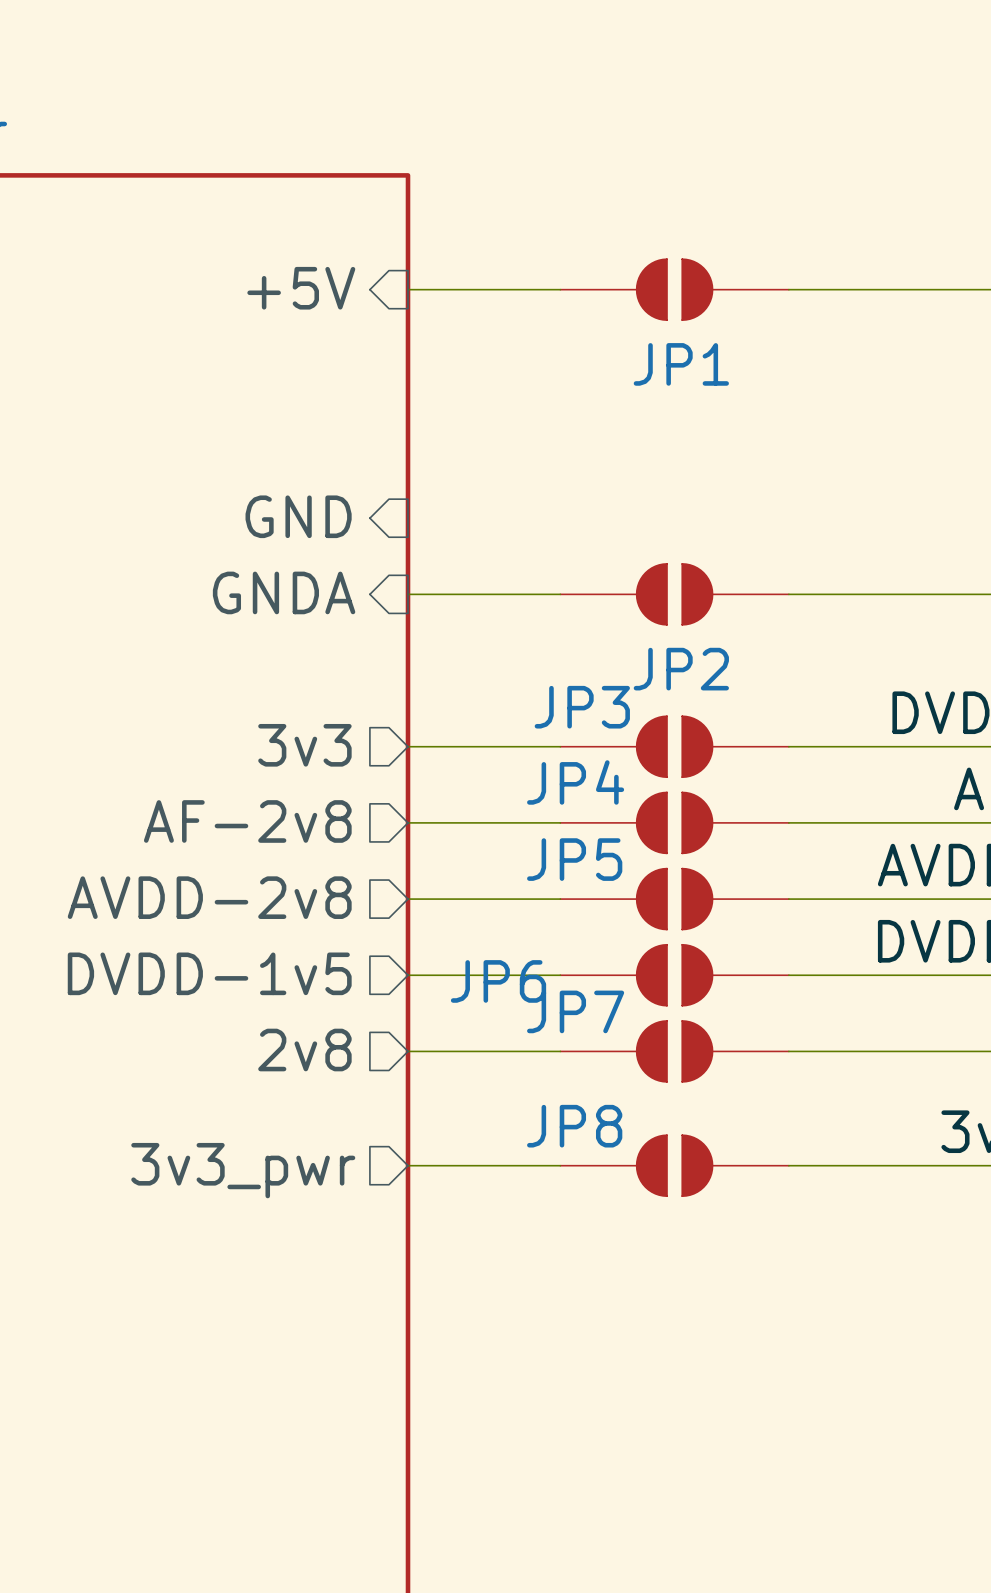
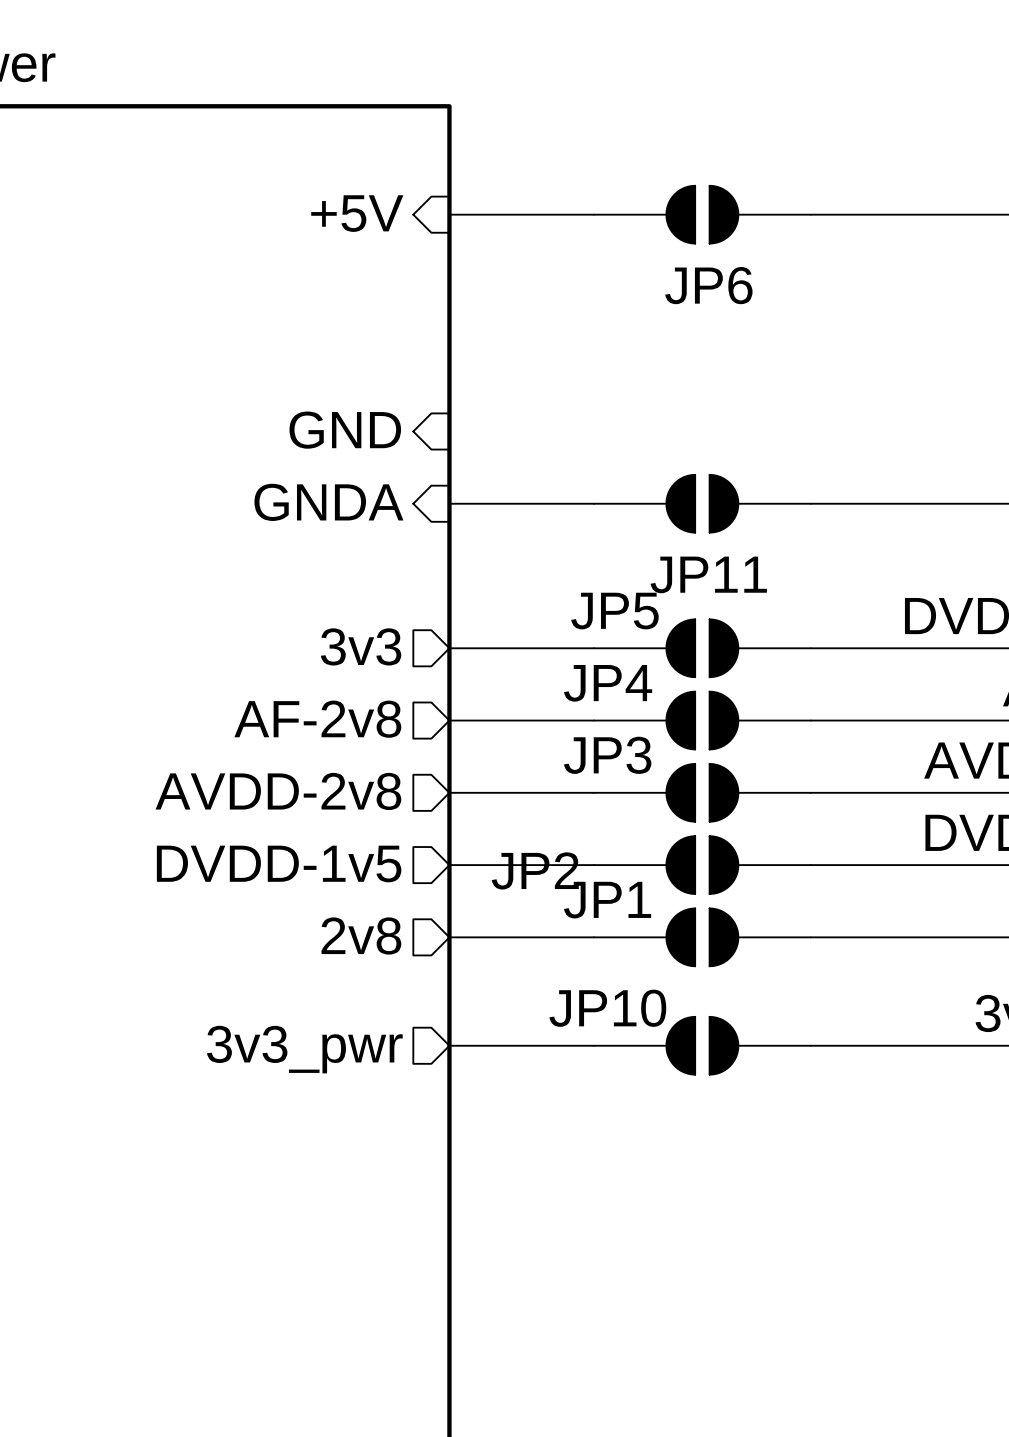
JP1 name: JP1 (681, 364) -> JP6 (708, 285)
JP2 name: JP2 (681, 669) -> JP11 (708, 574)
JP3 name: JP3 (582, 707) -> JP5 (614, 611)
JP5 name: JP5 (574, 859) -> JP3 (607, 755)
JP6 name: JP6 (498, 981) -> JP2 (535, 870)
JP7 name: JP7 (575, 1011) -> JP1 (607, 900)
JP8 name: JP8 (574, 1126) -> JP10 (607, 1008)

